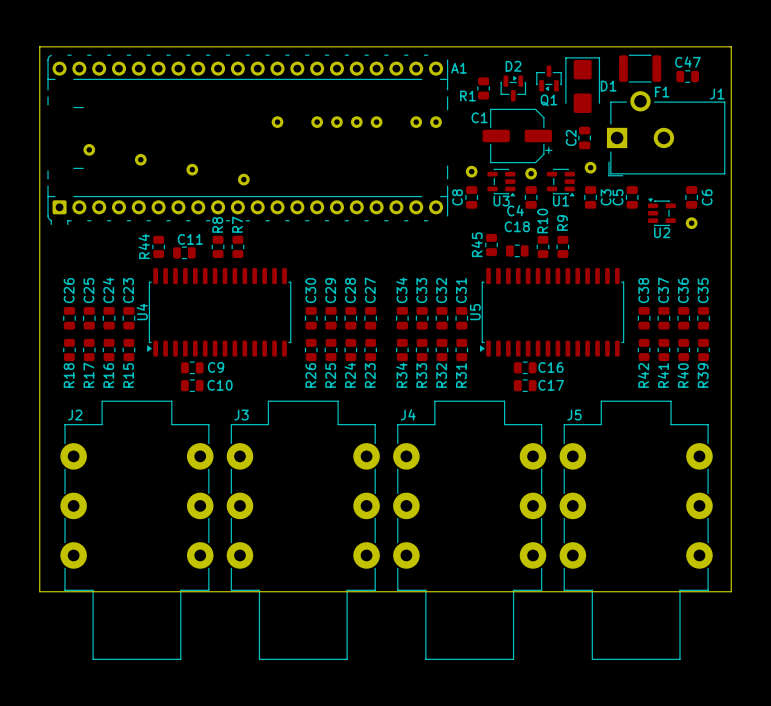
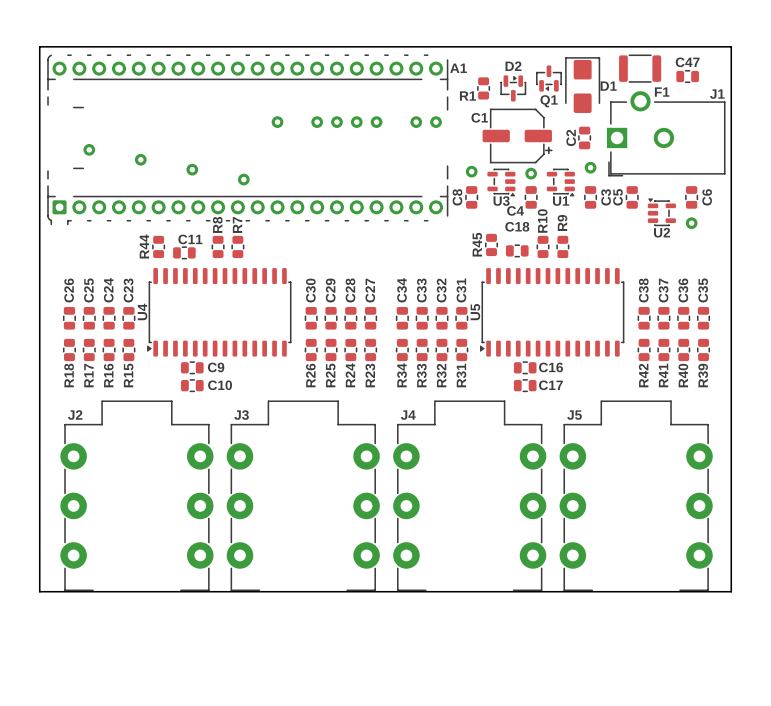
J2 footprint: [60, 400, 214, 660] -> [60, 400, 214, 591]
J3 footprint: [226, 400, 380, 660] -> [226, 400, 380, 591]
J4 footprint: [393, 400, 547, 660] -> [393, 400, 547, 591]
J5 footprint: [559, 400, 713, 660] -> [559, 400, 713, 591]

